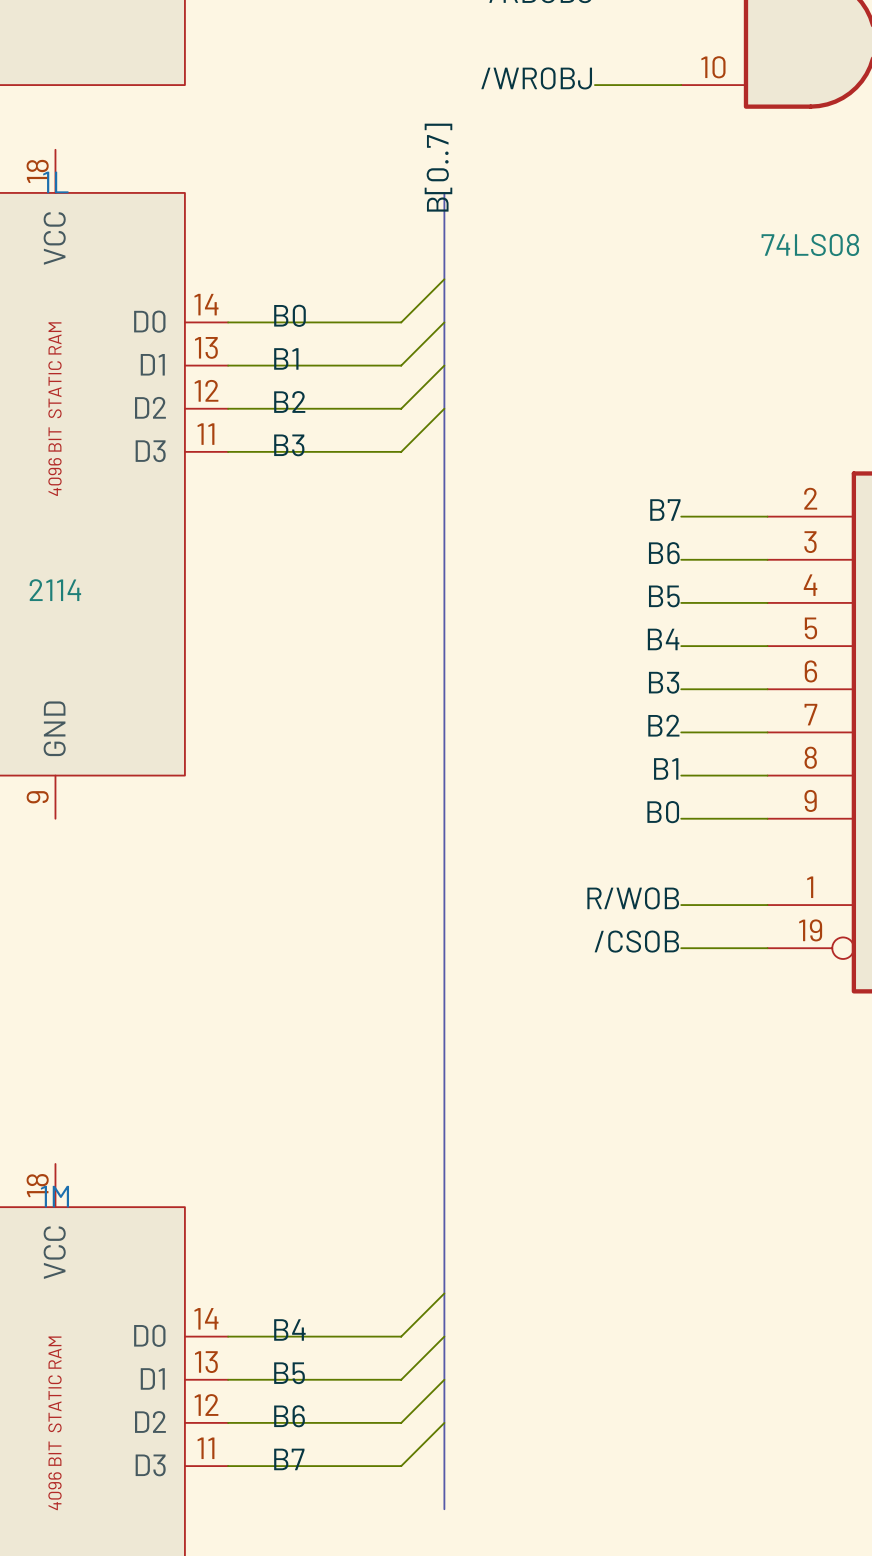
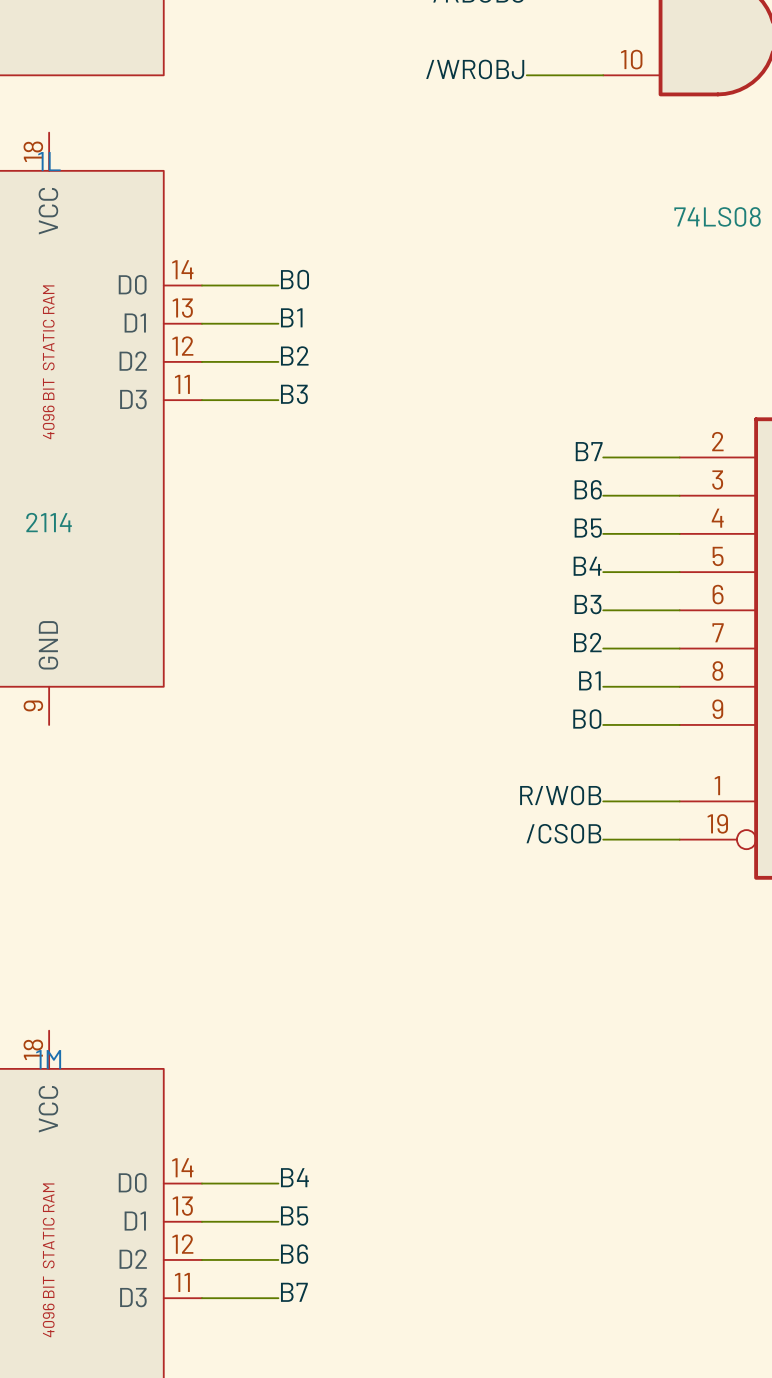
label: B[0..7] (438, 167) -> none
bus: (444, 192) (444, 1509) -> none
wire: (444, 279) (401, 322) (314, 322) -> none
label position: B0 (289, 315) -> B0 (294, 279)
wire: (444, 322) (401, 365) (314, 365) -> none
label position: B1 (286, 358) -> B1 (291, 317)
wire: (444, 365) (401, 408) (314, 408) -> none
label position: B2 (289, 401) -> B2 (294, 355)
wire: (444, 408) (401, 451) (314, 451) -> none
label position: B3 (289, 445) -> B3 (294, 394)
wire: (444, 1293) (401, 1336) (314, 1336) -> none
label position: B4 (289, 1329) -> B4 (294, 1177)
wire: (444, 1336) (401, 1379) (314, 1379) -> none
label position: B5 (289, 1373) -> B5 (294, 1215)
wire: (444, 1379) (401, 1422) (314, 1422) -> none
label position: B6 (289, 1416) -> B6 (294, 1254)
wire: (444, 1422) (401, 1466) (314, 1466) -> none
label position: B7 (289, 1459) -> B7 (294, 1292)

